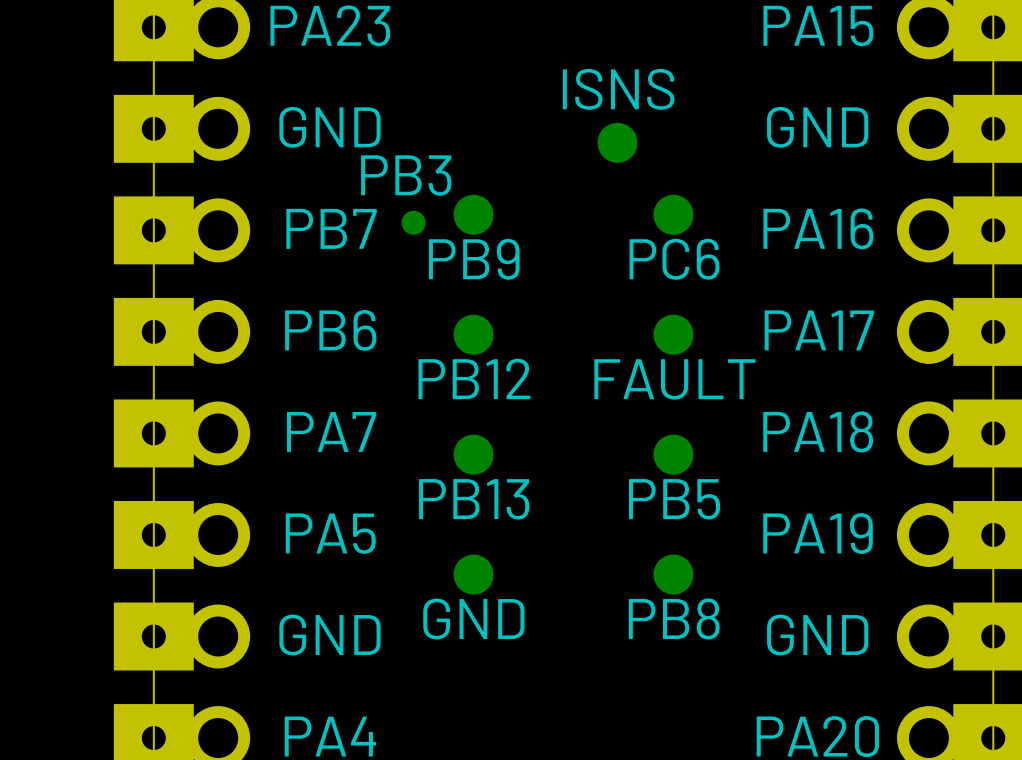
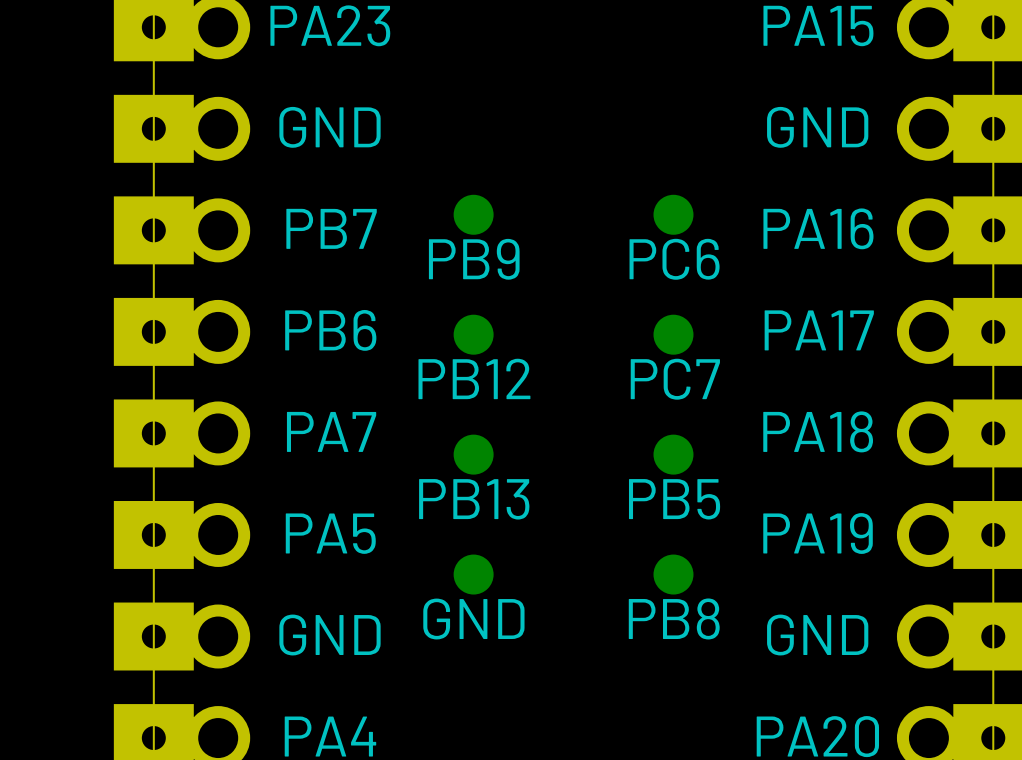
text: ISNS (618, 89) -> none
part: (617, 142) -> none
text: PB3 (406, 175) -> none
part: (413, 222) -> none
text: FAULT (674, 379) -> PC7 (675, 379)

